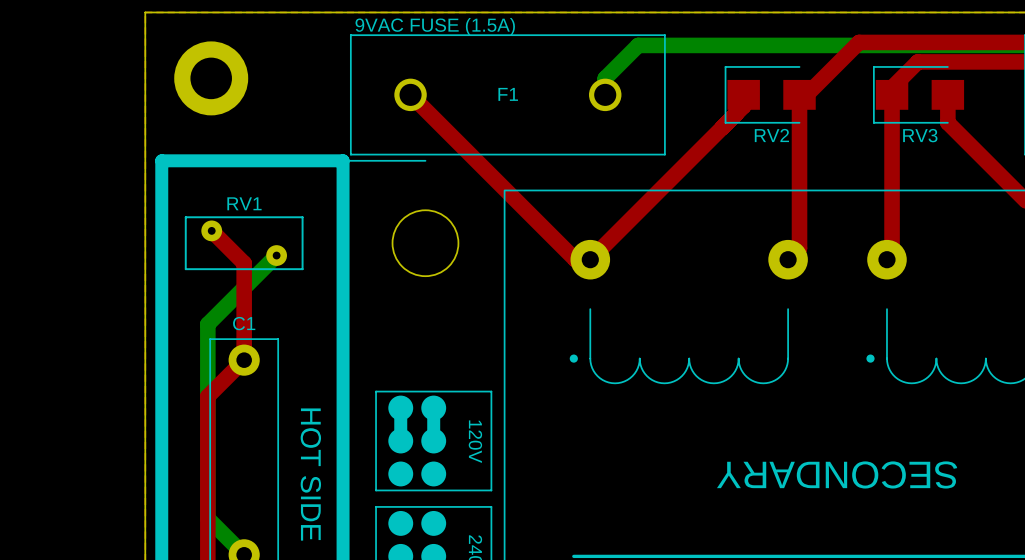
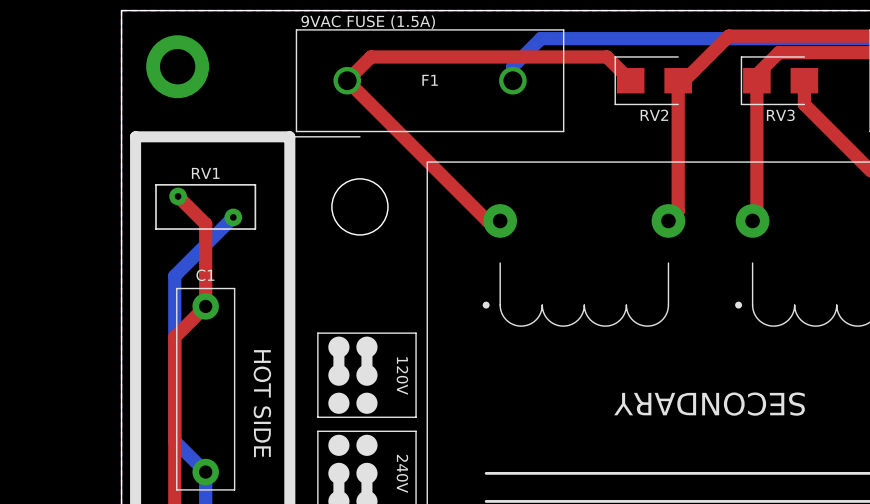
top track: (743, 94) (743, 106) (590, 259) -> (630, 80) (606, 56) (370, 56) (347, 80)

